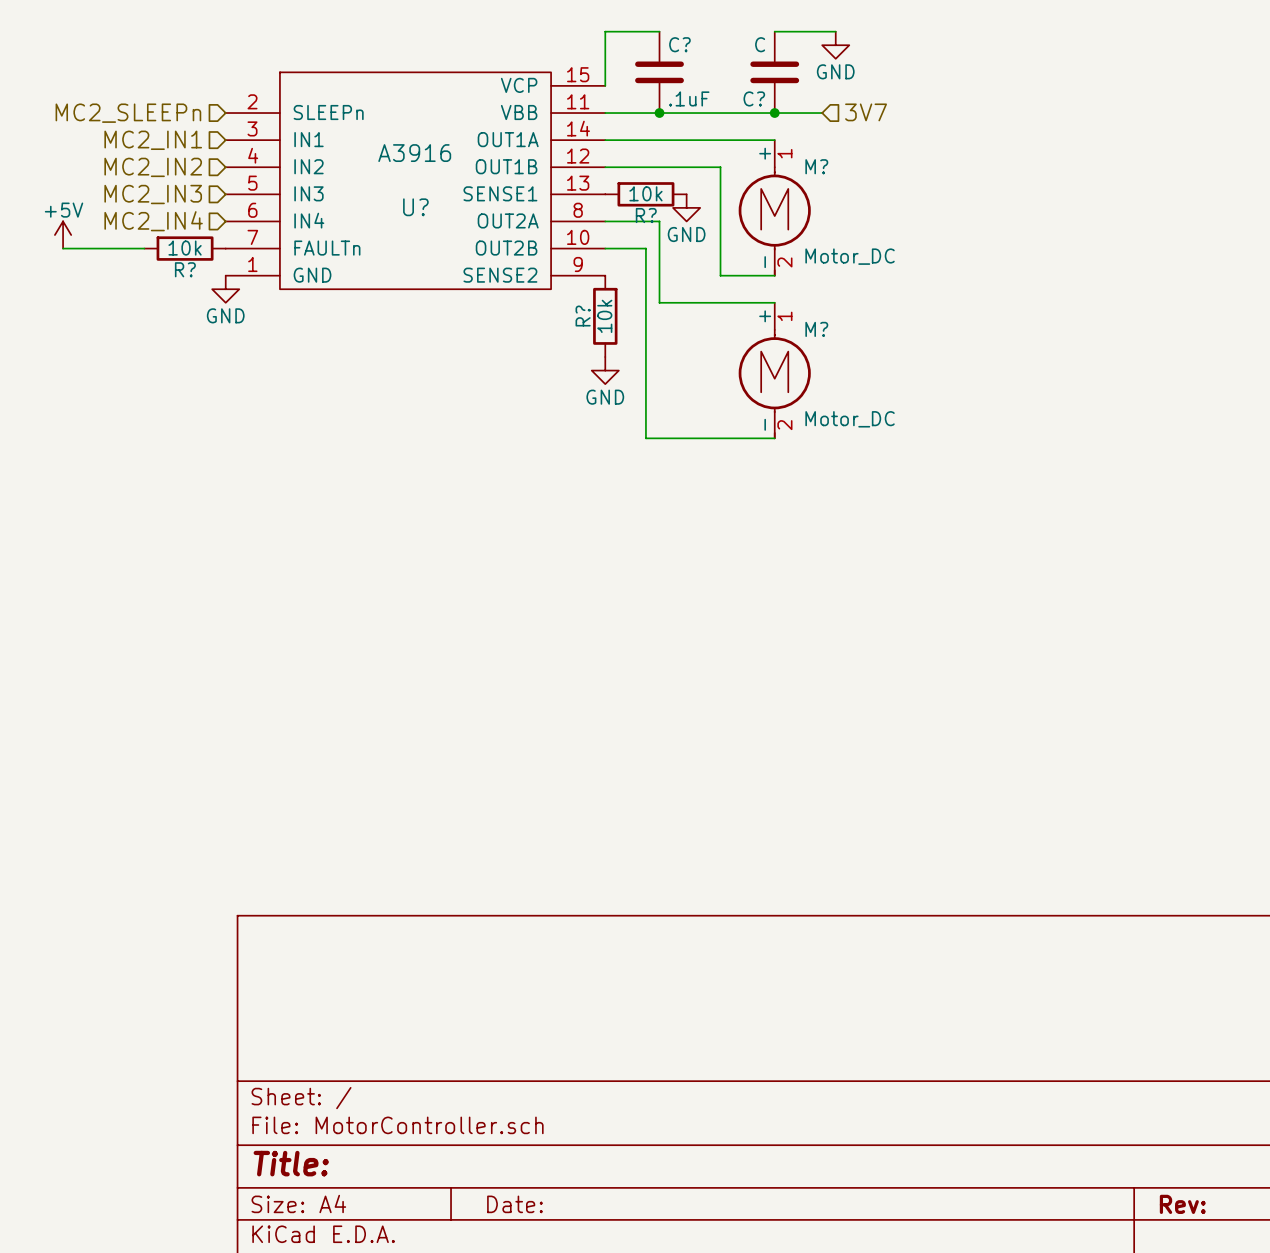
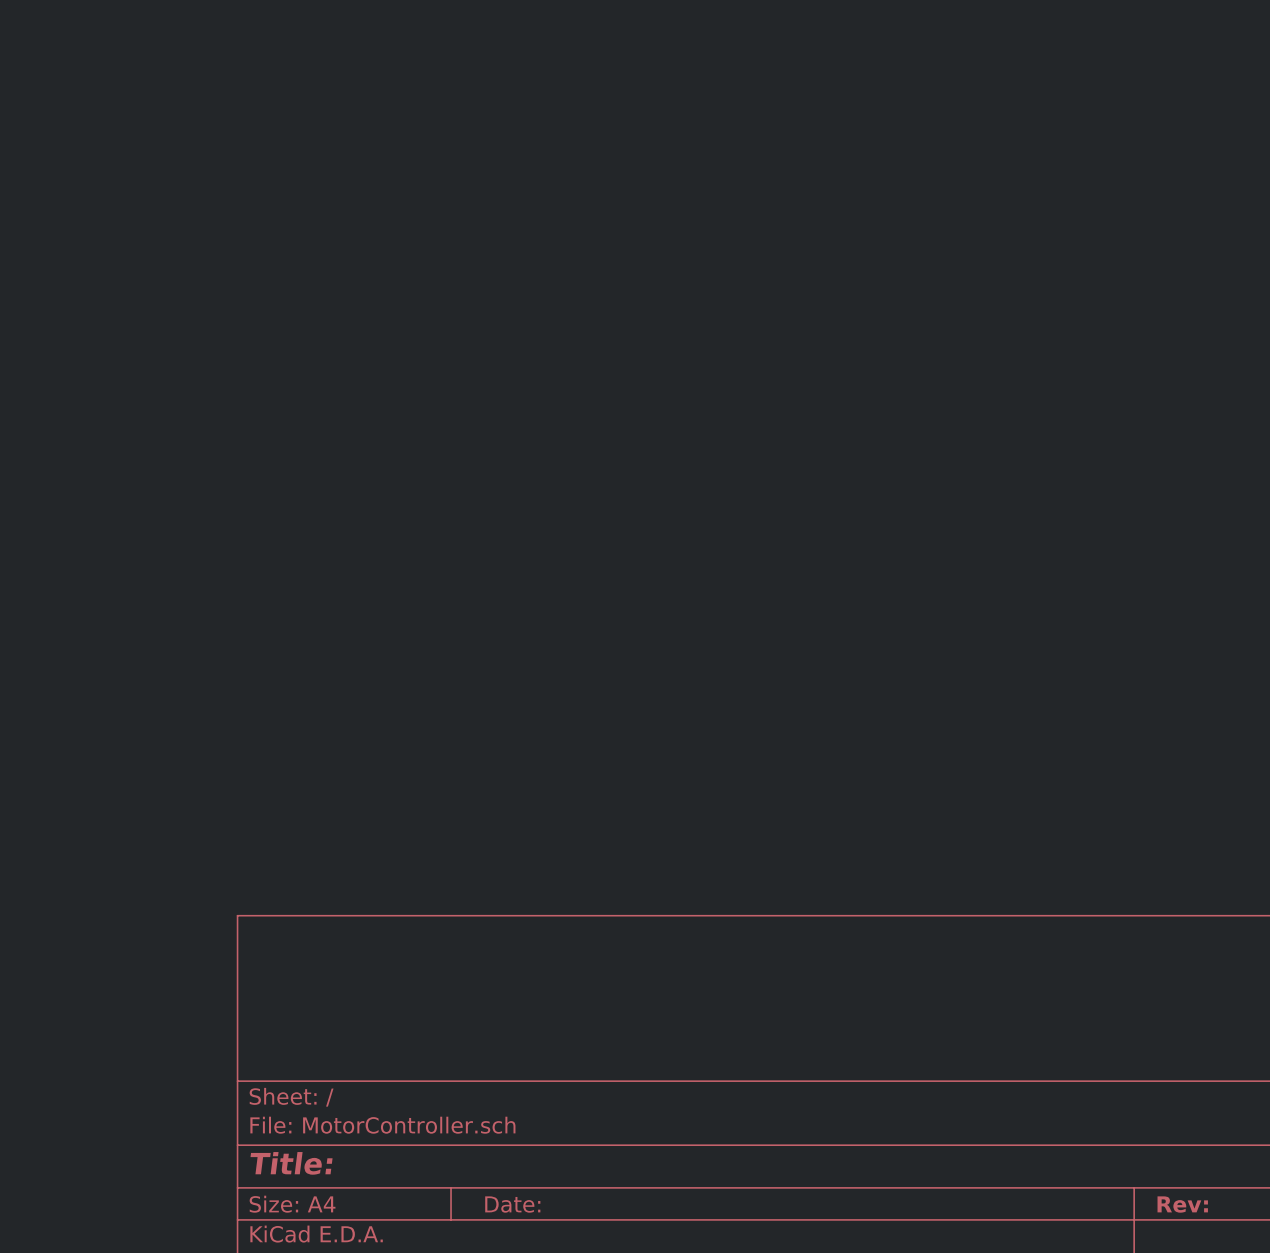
wire: (659, 31) (605, 31) (605, 85) -> none
wire: (774, 31) (835, 31) -> none
power symbol: GND (835, 45) -> none
C?: .1uF (659, 72) -> none
C?: C (774, 72) -> none
hierarchical label: 3V7 (866, 112) -> none
hierarchical label: MC2_SLEEPn (128, 113) -> none
wire: (605, 113) (822, 113) -> none
junction: (659, 113) -> none
junction: (774, 113) -> none
hierarchical label: MC2_IN1 (153, 140) -> none
wire: (605, 140) (774, 140) -> none
hierarchical label: MC2_IN2 (153, 167) -> none
wire: (605, 167) (720, 167) (720, 275) (774, 275) -> none
U?: A3916 (415, 180) -> none
hierarchical label: MC2_IN3 (153, 194) -> none
R?: 10k (645, 194) -> none
power symbol: GND (686, 207) -> none
M?: Motor_DC (774, 207) -> none
hierarchical label: MC2_IN4 (153, 221) -> none
wire: (605, 221) (659, 221) (659, 302) (774, 302) -> none
power symbol: +5V (63, 235) -> none
wire: (63, 248) (144, 248) -> none
R?: 10k (185, 248) -> none
wire: (605, 248) (645, 248) (645, 438) (774, 438) -> none
power symbol: GND (225, 289) -> none
R?: 10k (605, 316) -> none
power symbol: GND (605, 370) -> none
M?: Motor_DC (774, 370) -> none

